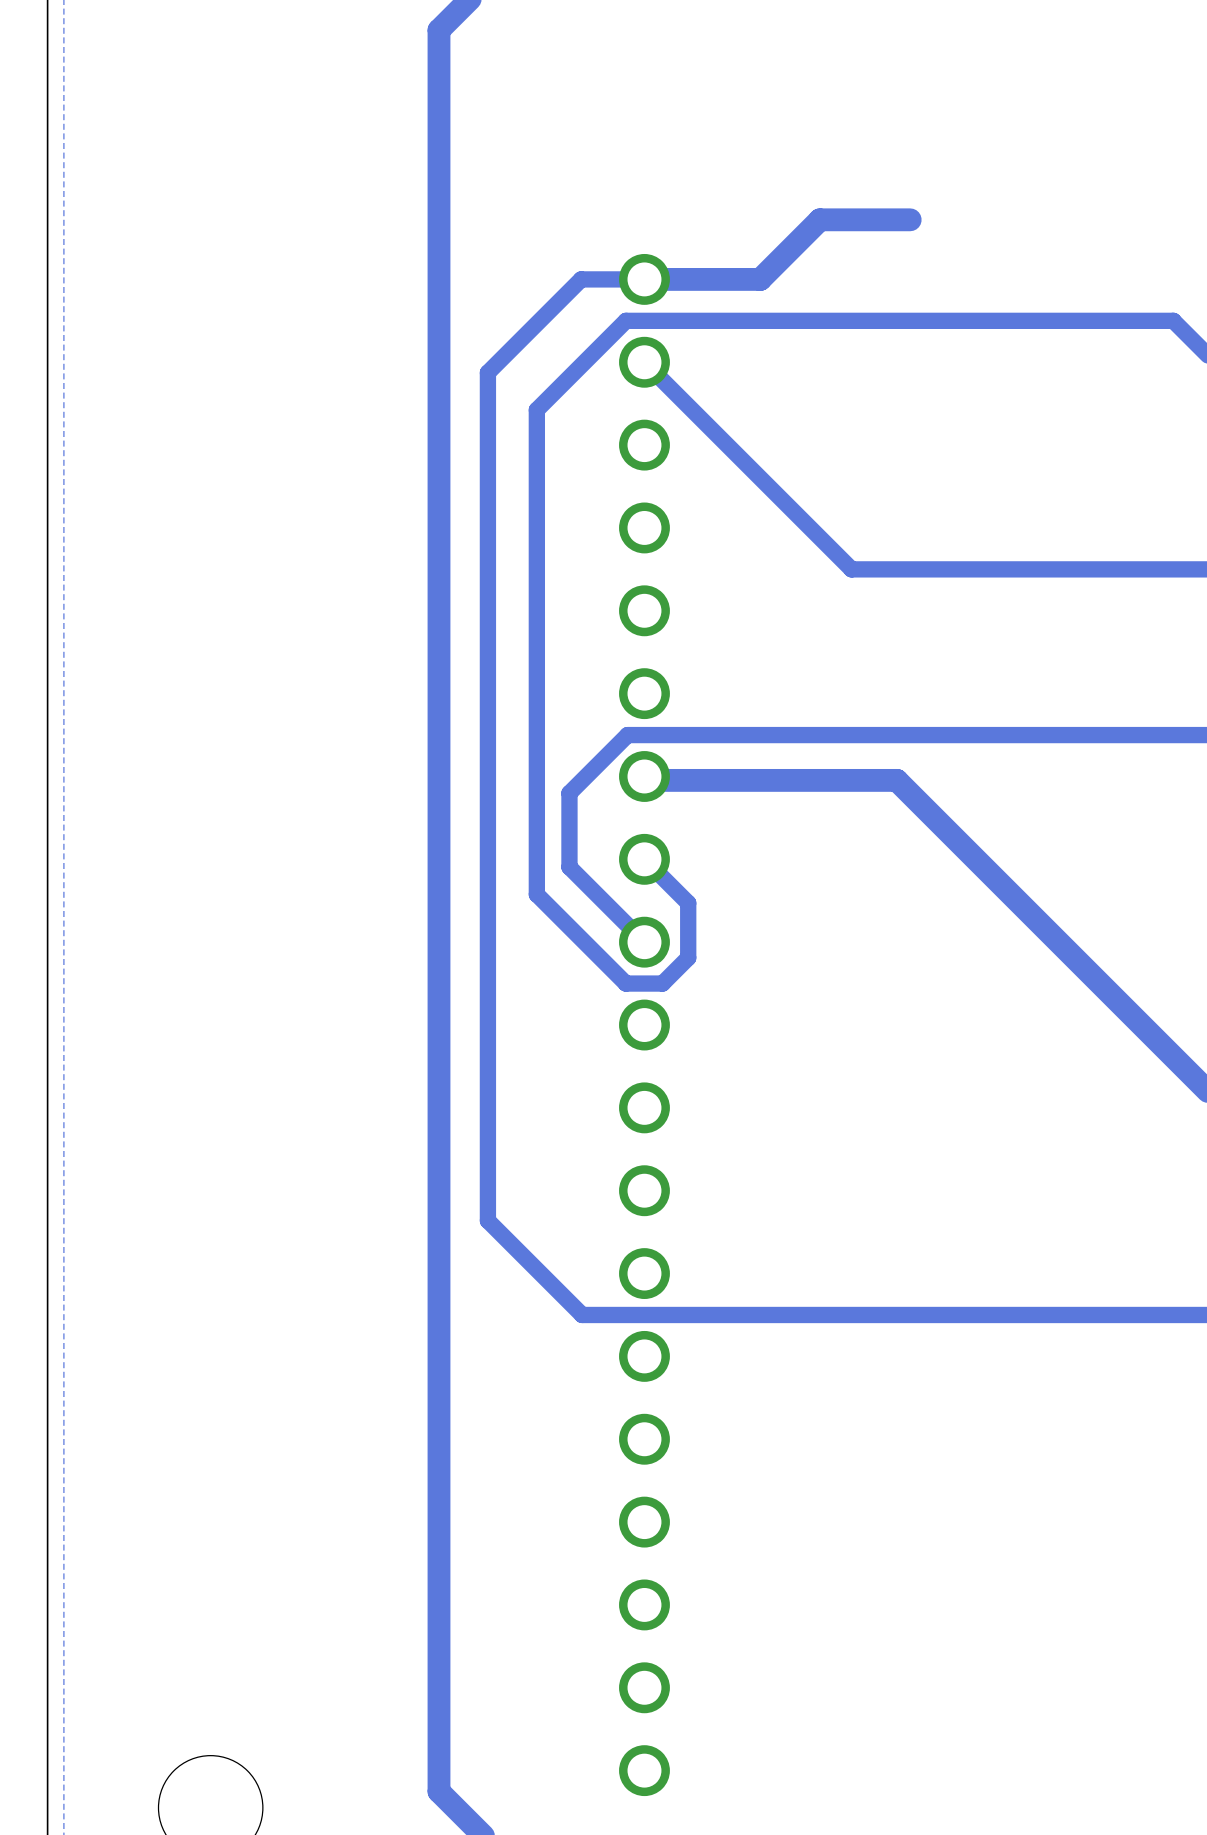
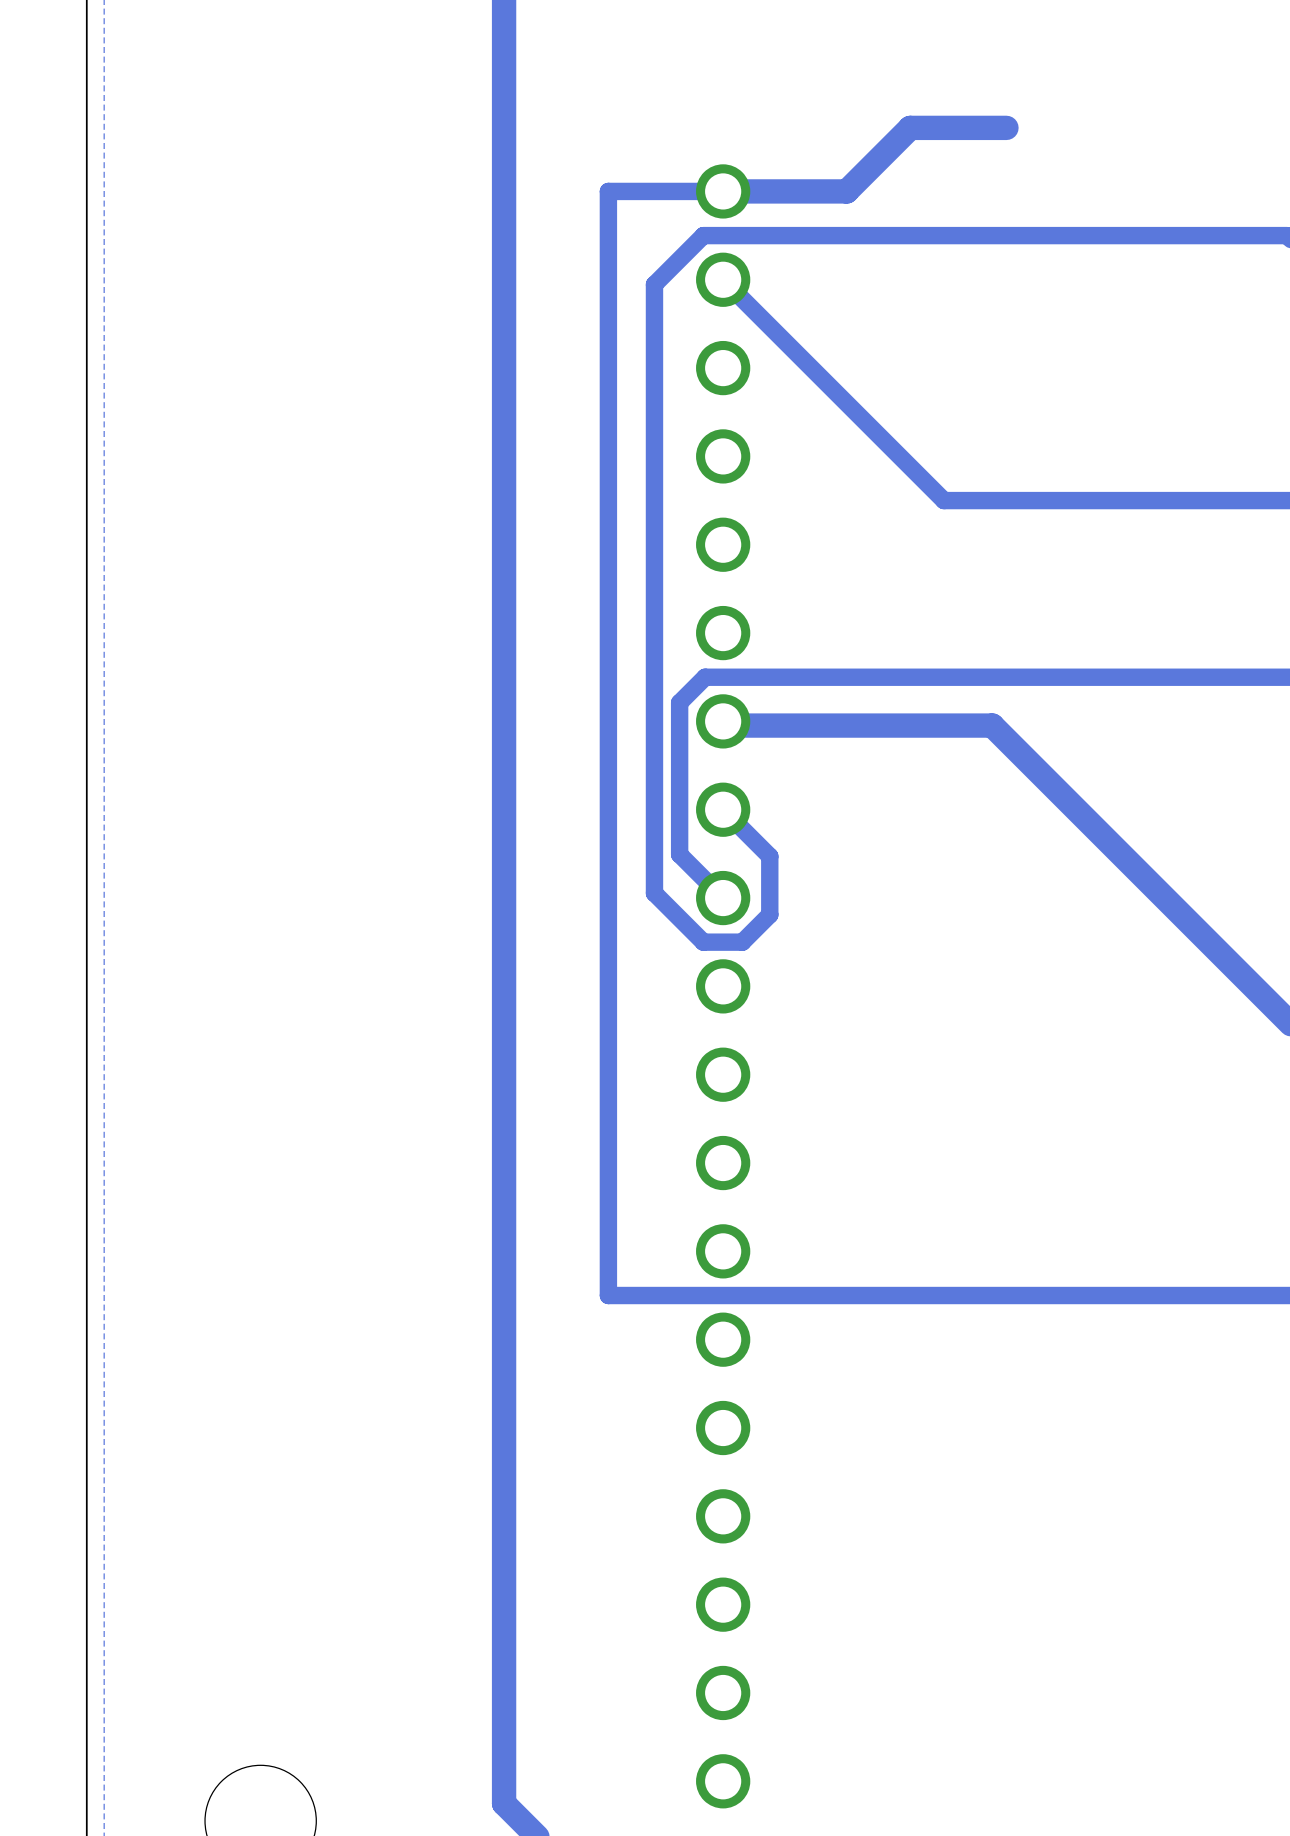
bottom track: (581, 279) (487, 372) (487, 1220) (582, 1314) -> none
bottom track: (580, 366) (536, 409) -> (655, 191) (608, 191) (608, 330)
bottom track: none -> (654, 284) (654, 893)
bottom track: (603, 759) (569, 793) (569, 867) (603, 901) -> (679, 702) (679, 854)
bottom track: (536, 894) (580, 937) -> (608, 847) (608, 1295) (656, 1295)

